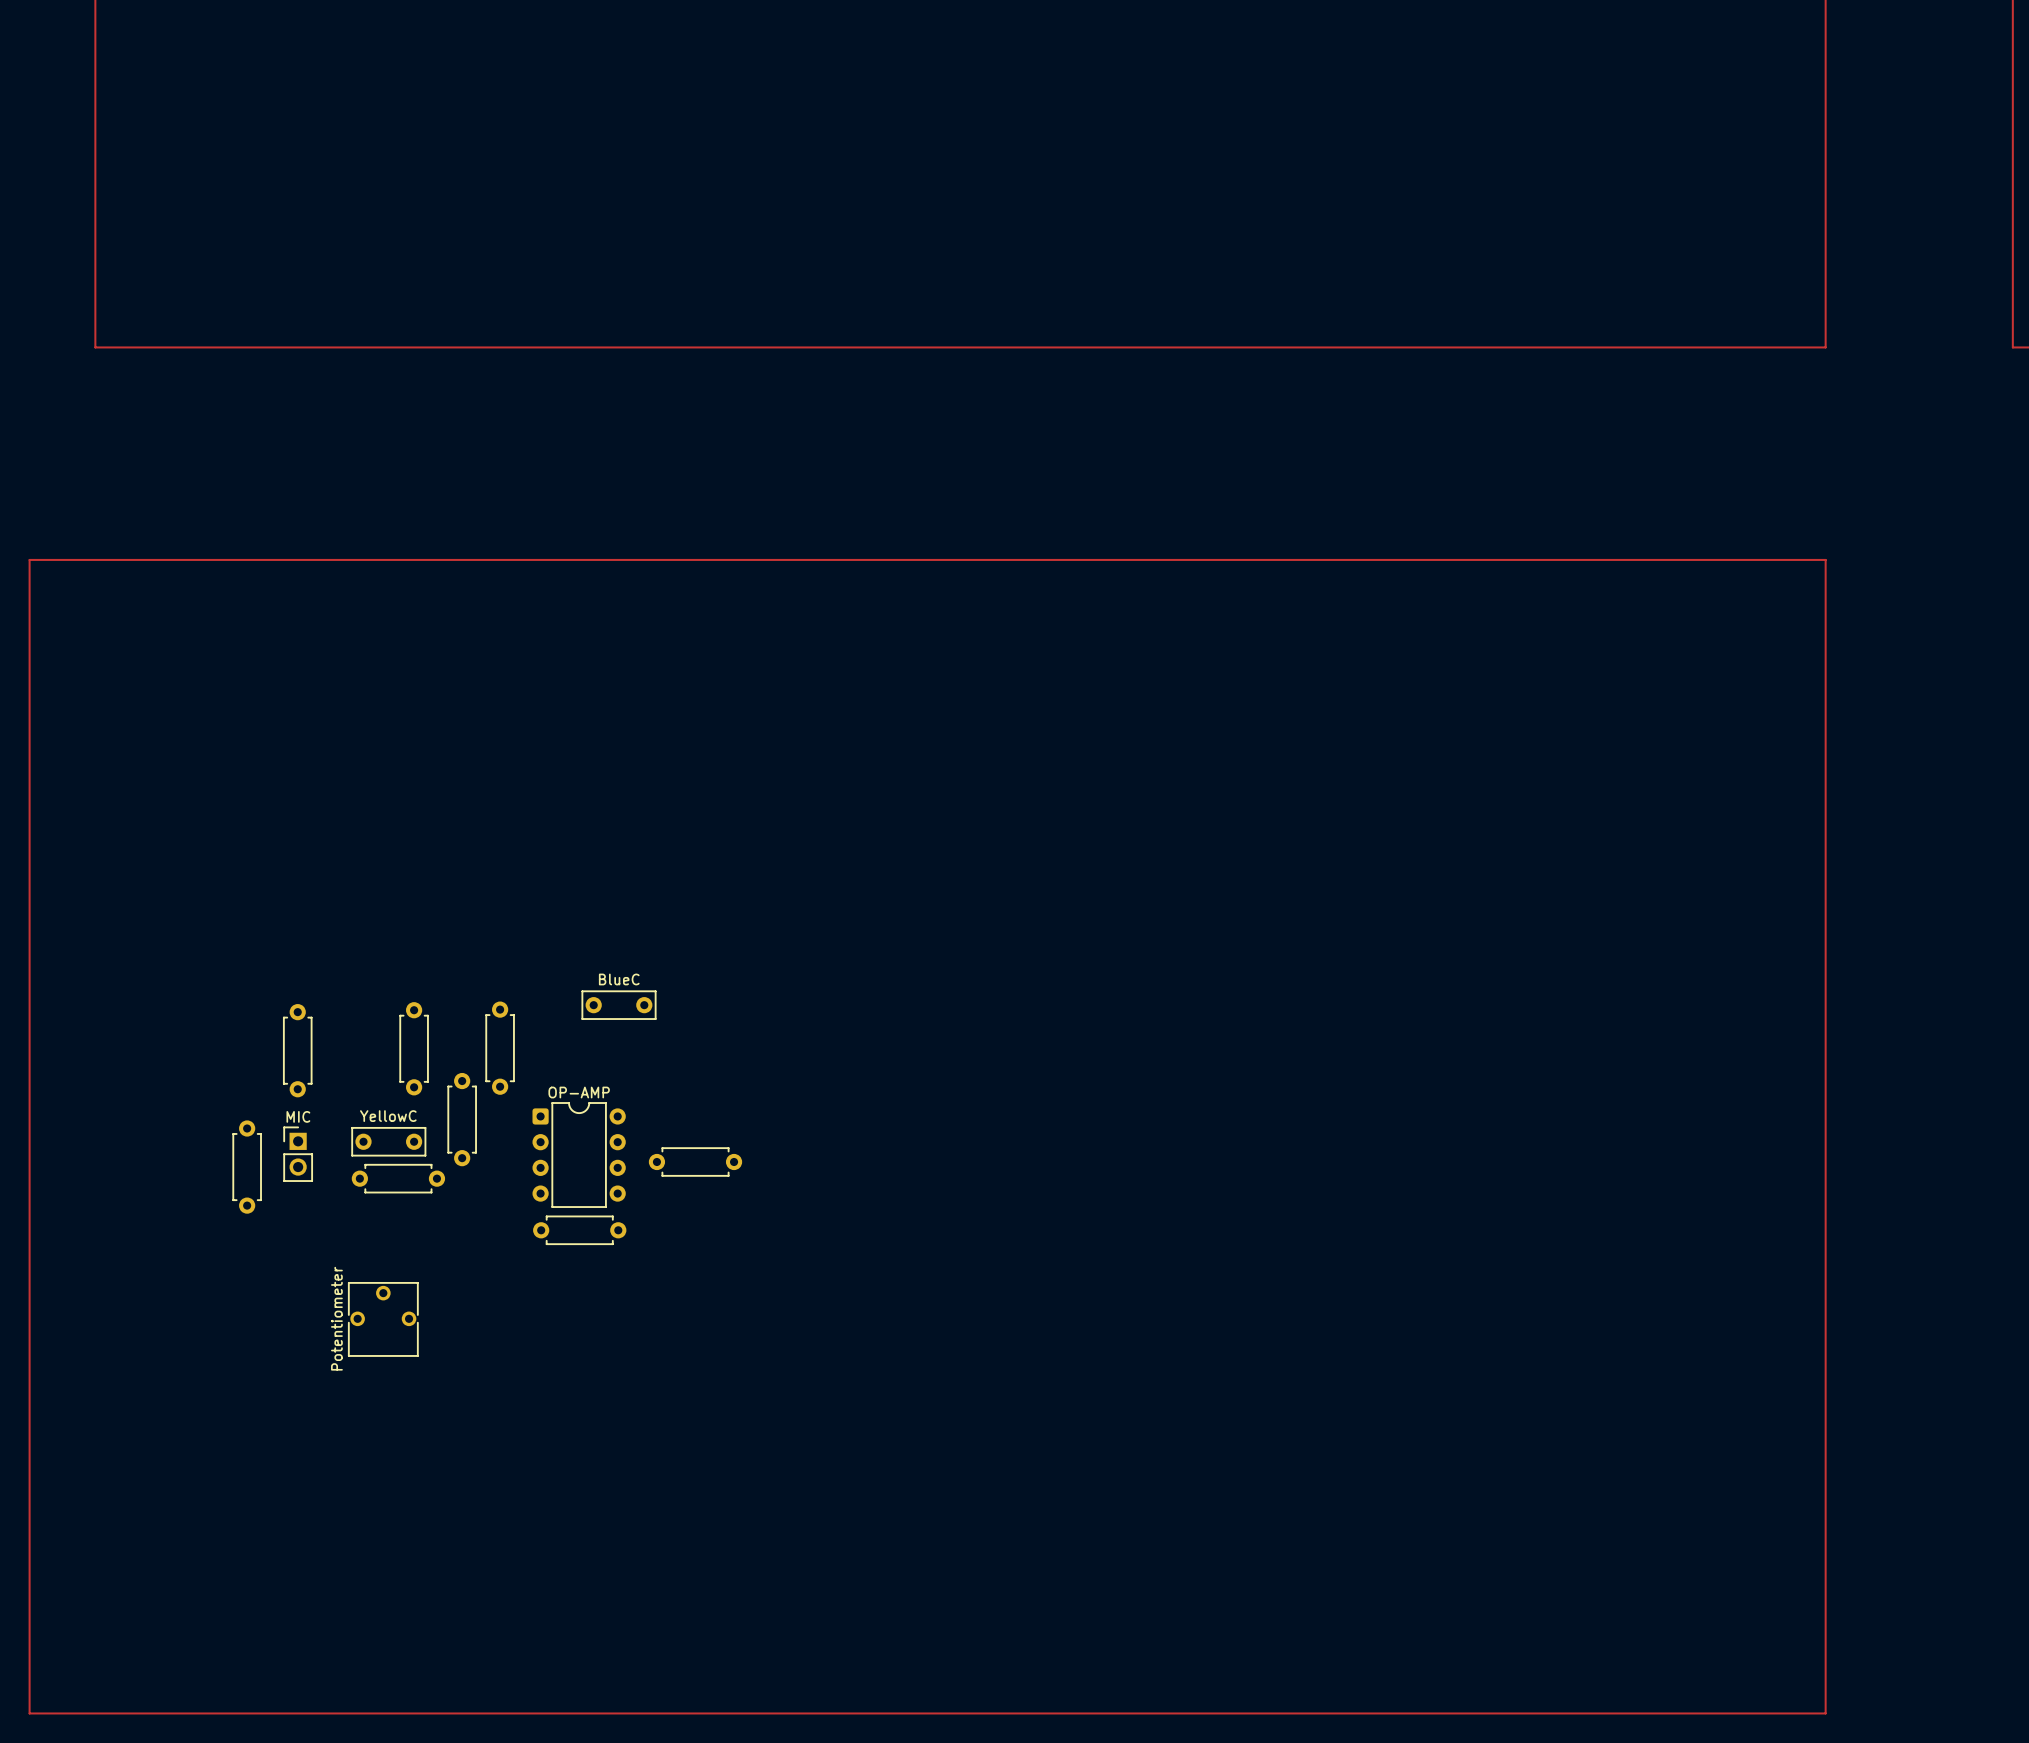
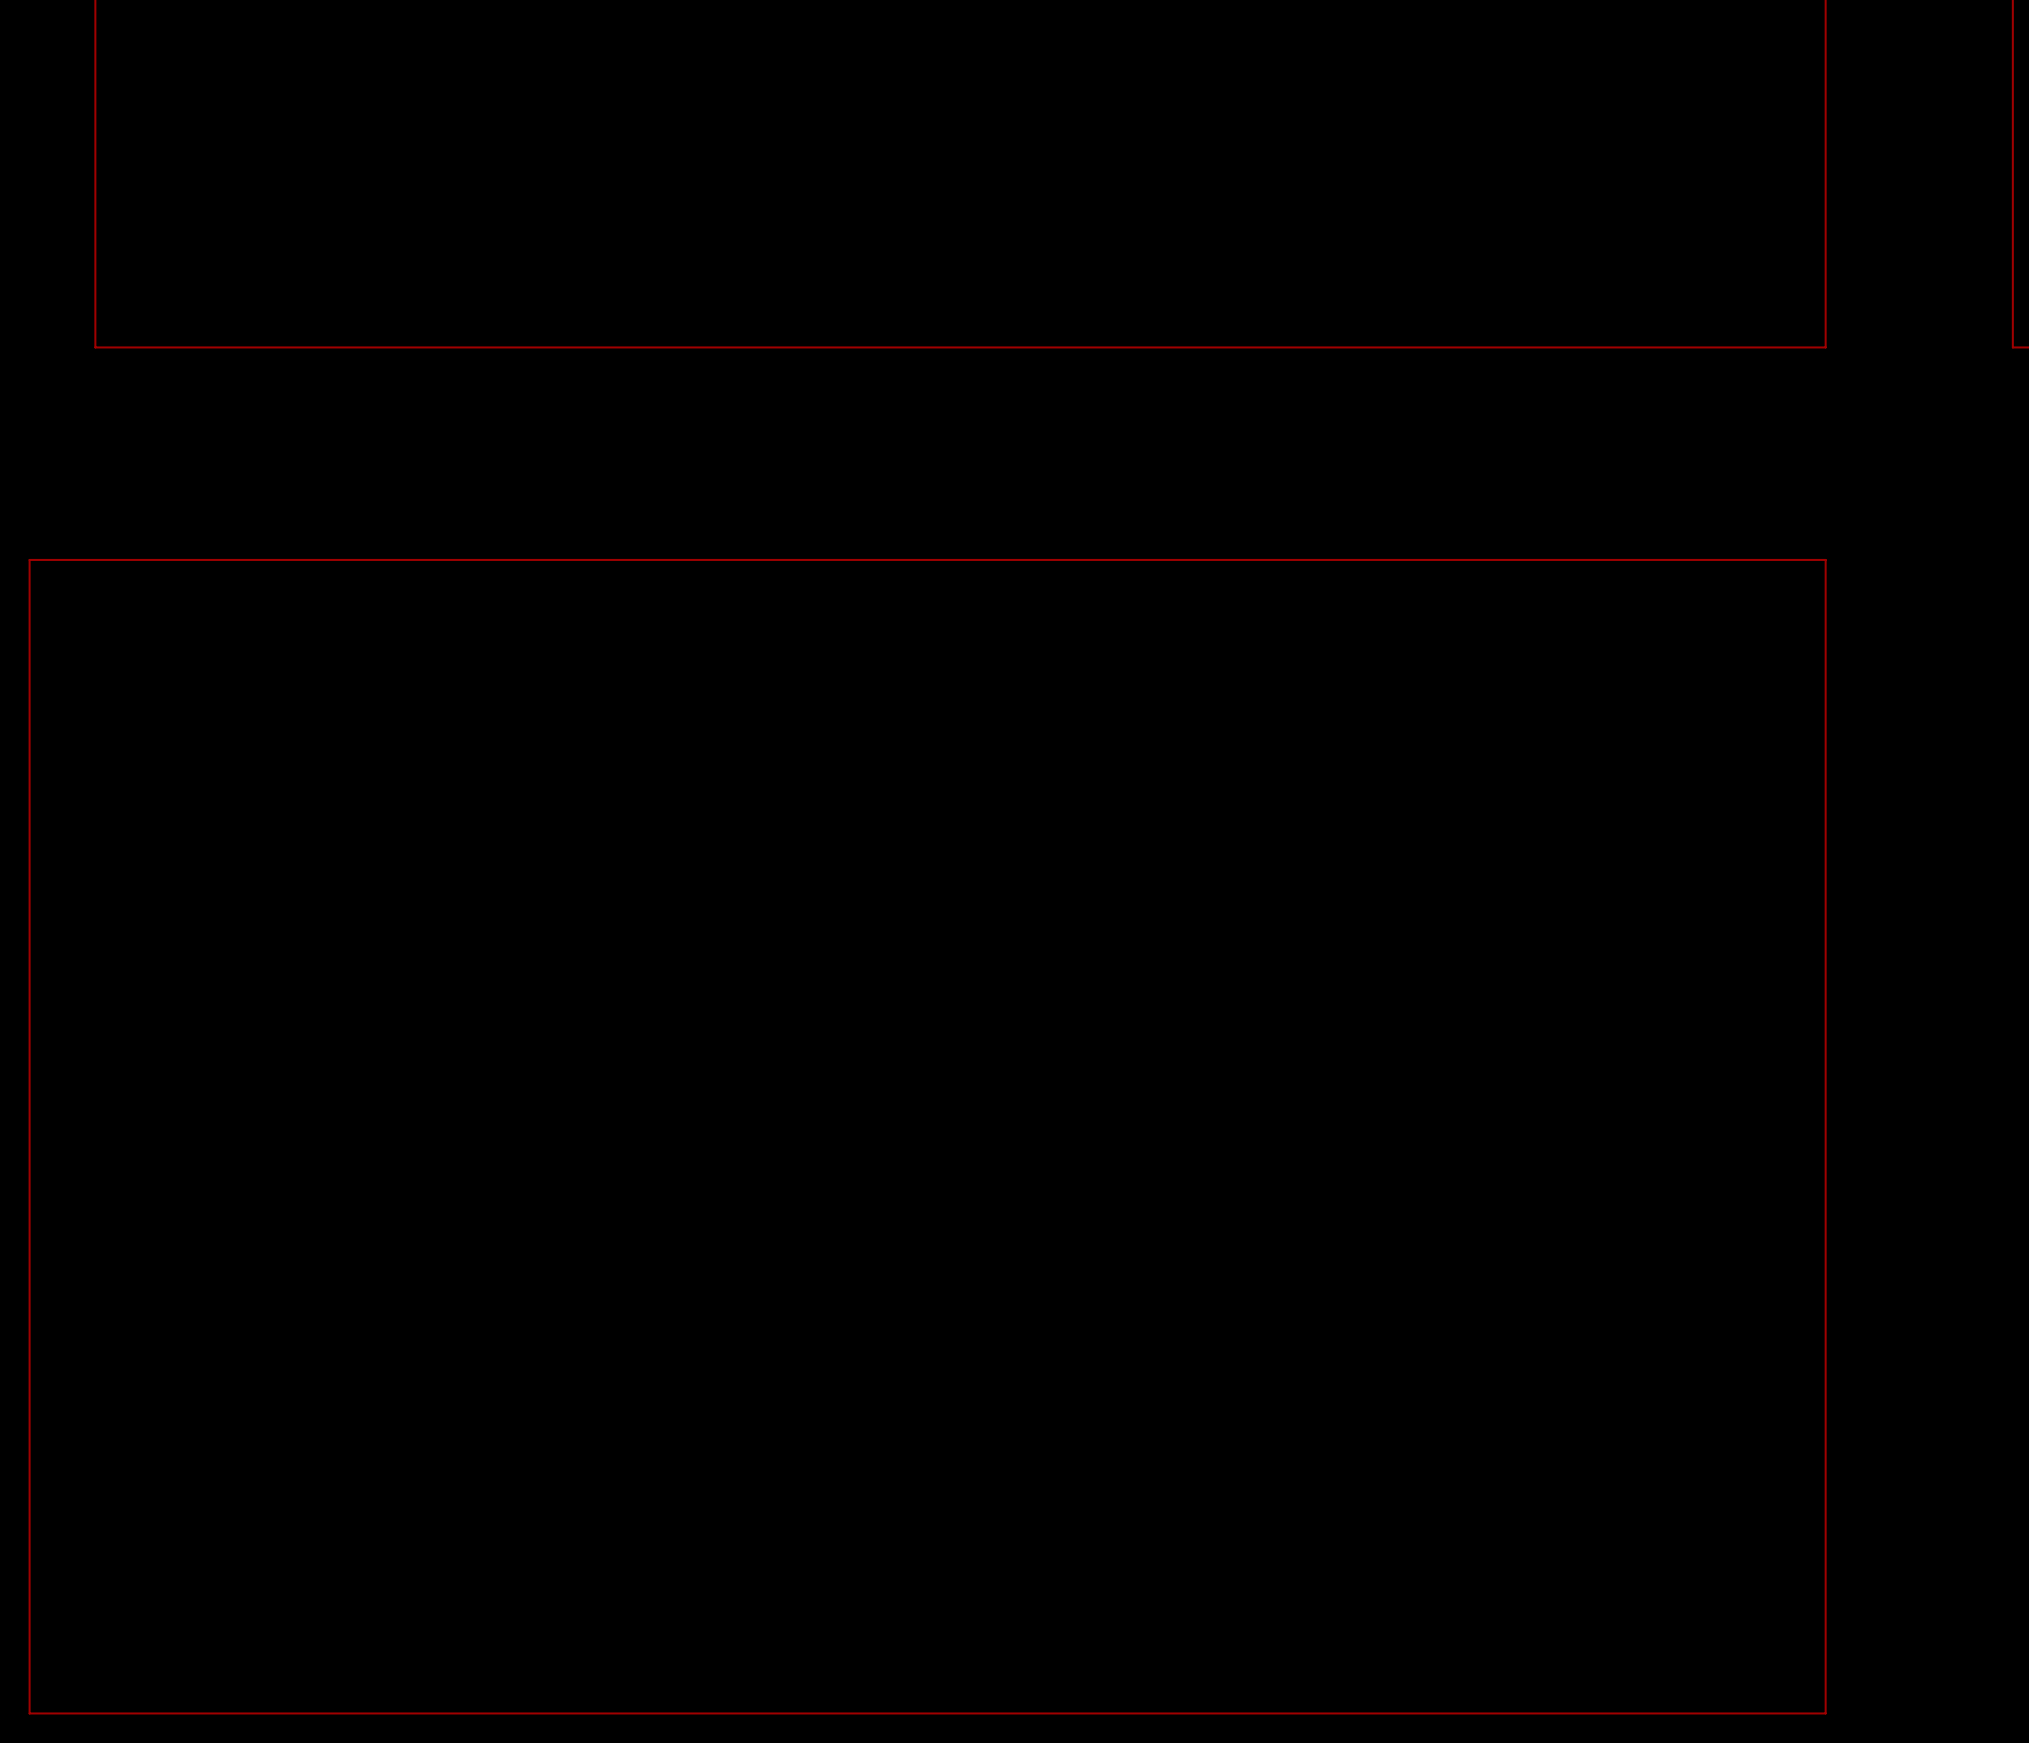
BlueC: (619, 1005) -> none
part: (414, 1048) -> none
part: (500, 1048) -> none
part: (297, 1050) -> none
part: (462, 1119) -> none
YellowC: (388, 1141) -> none
MIC: (298, 1154) -> none
OP-AMP: (579, 1155) -> none
part: (695, 1161) -> none
part: (247, 1167) -> none
part: (398, 1178) -> none
part: (579, 1230) -> none
Potentiometer: (383, 1319) -> none

